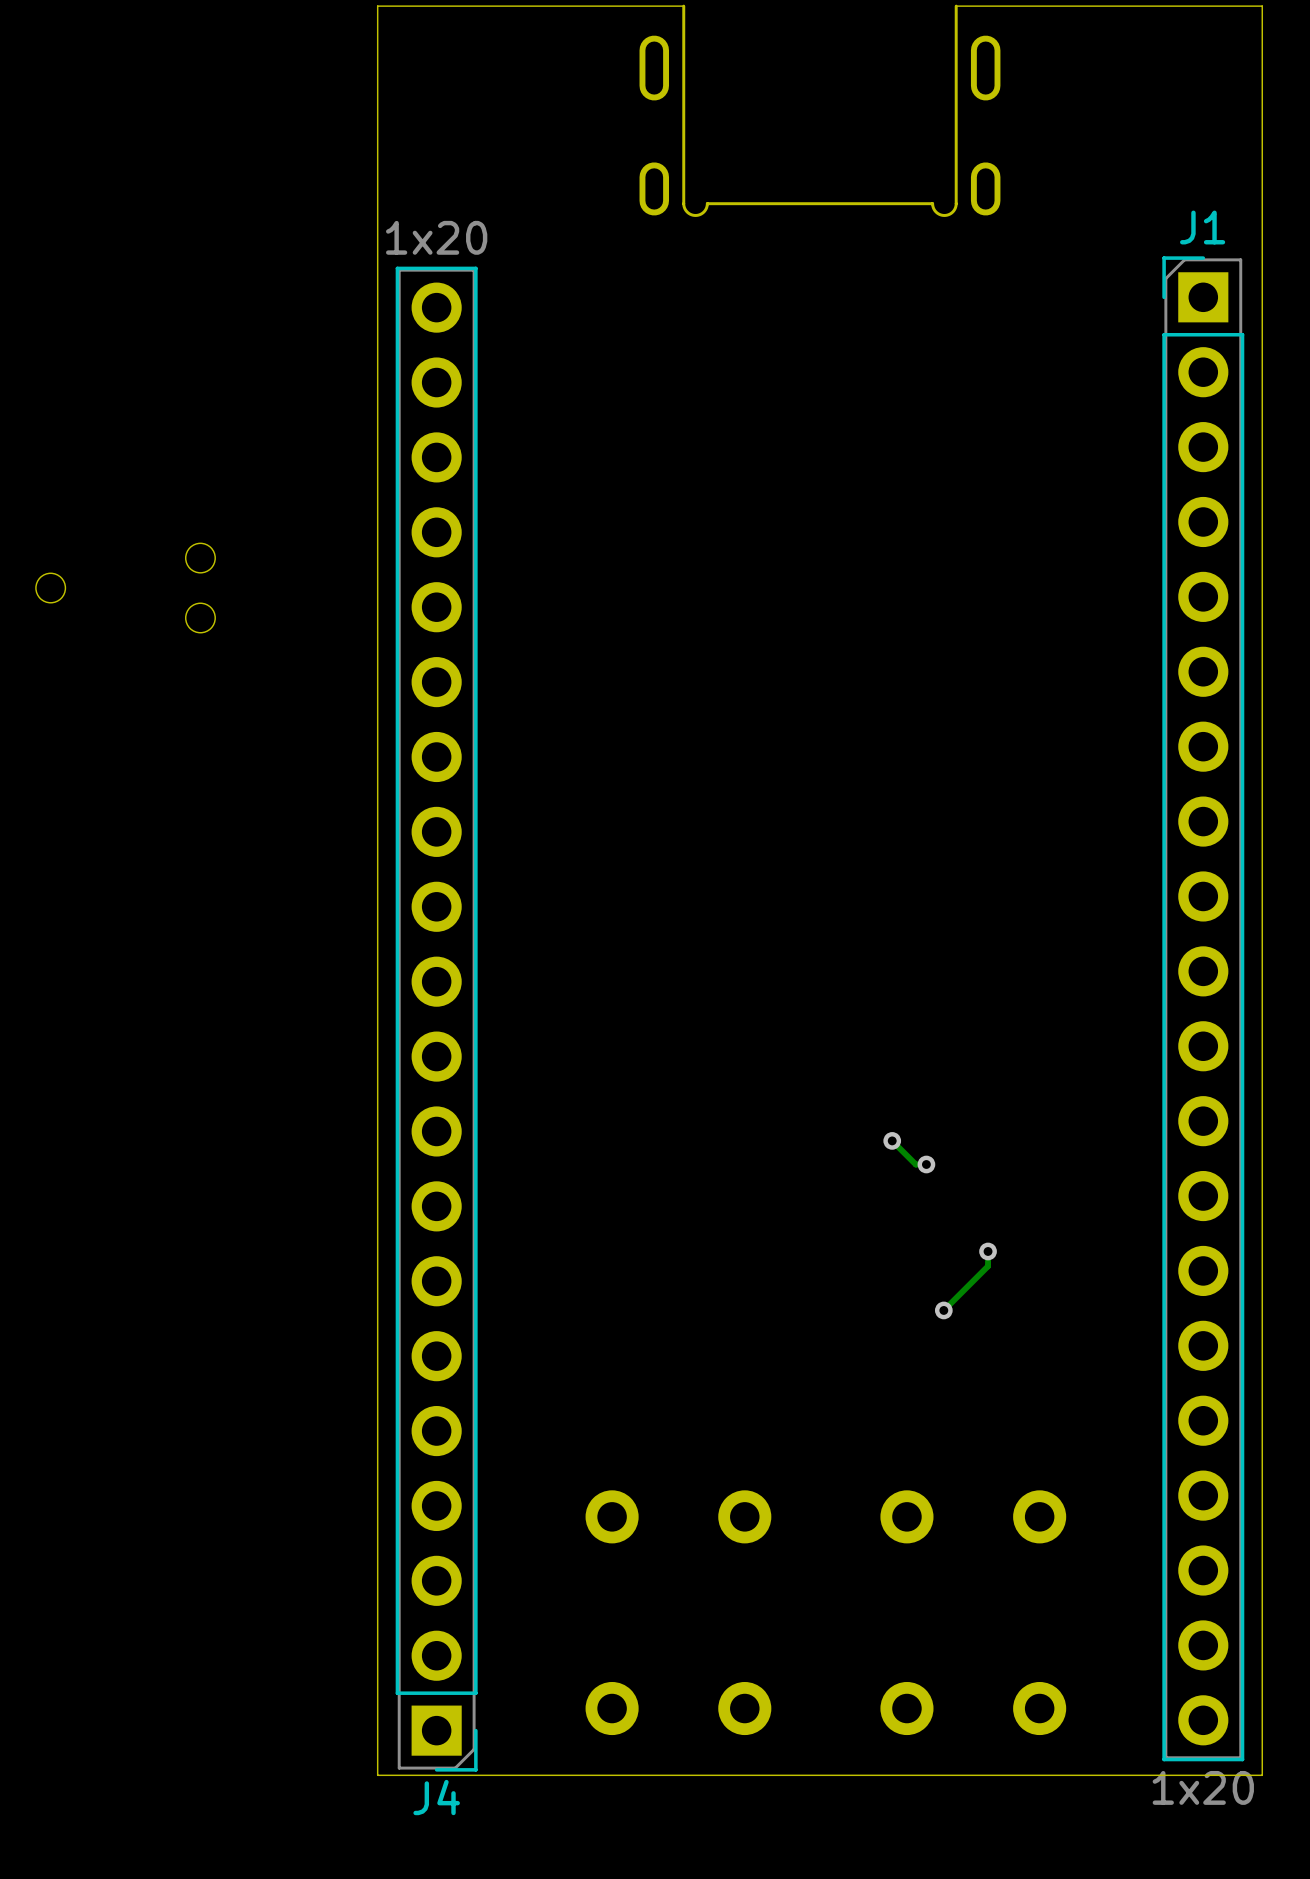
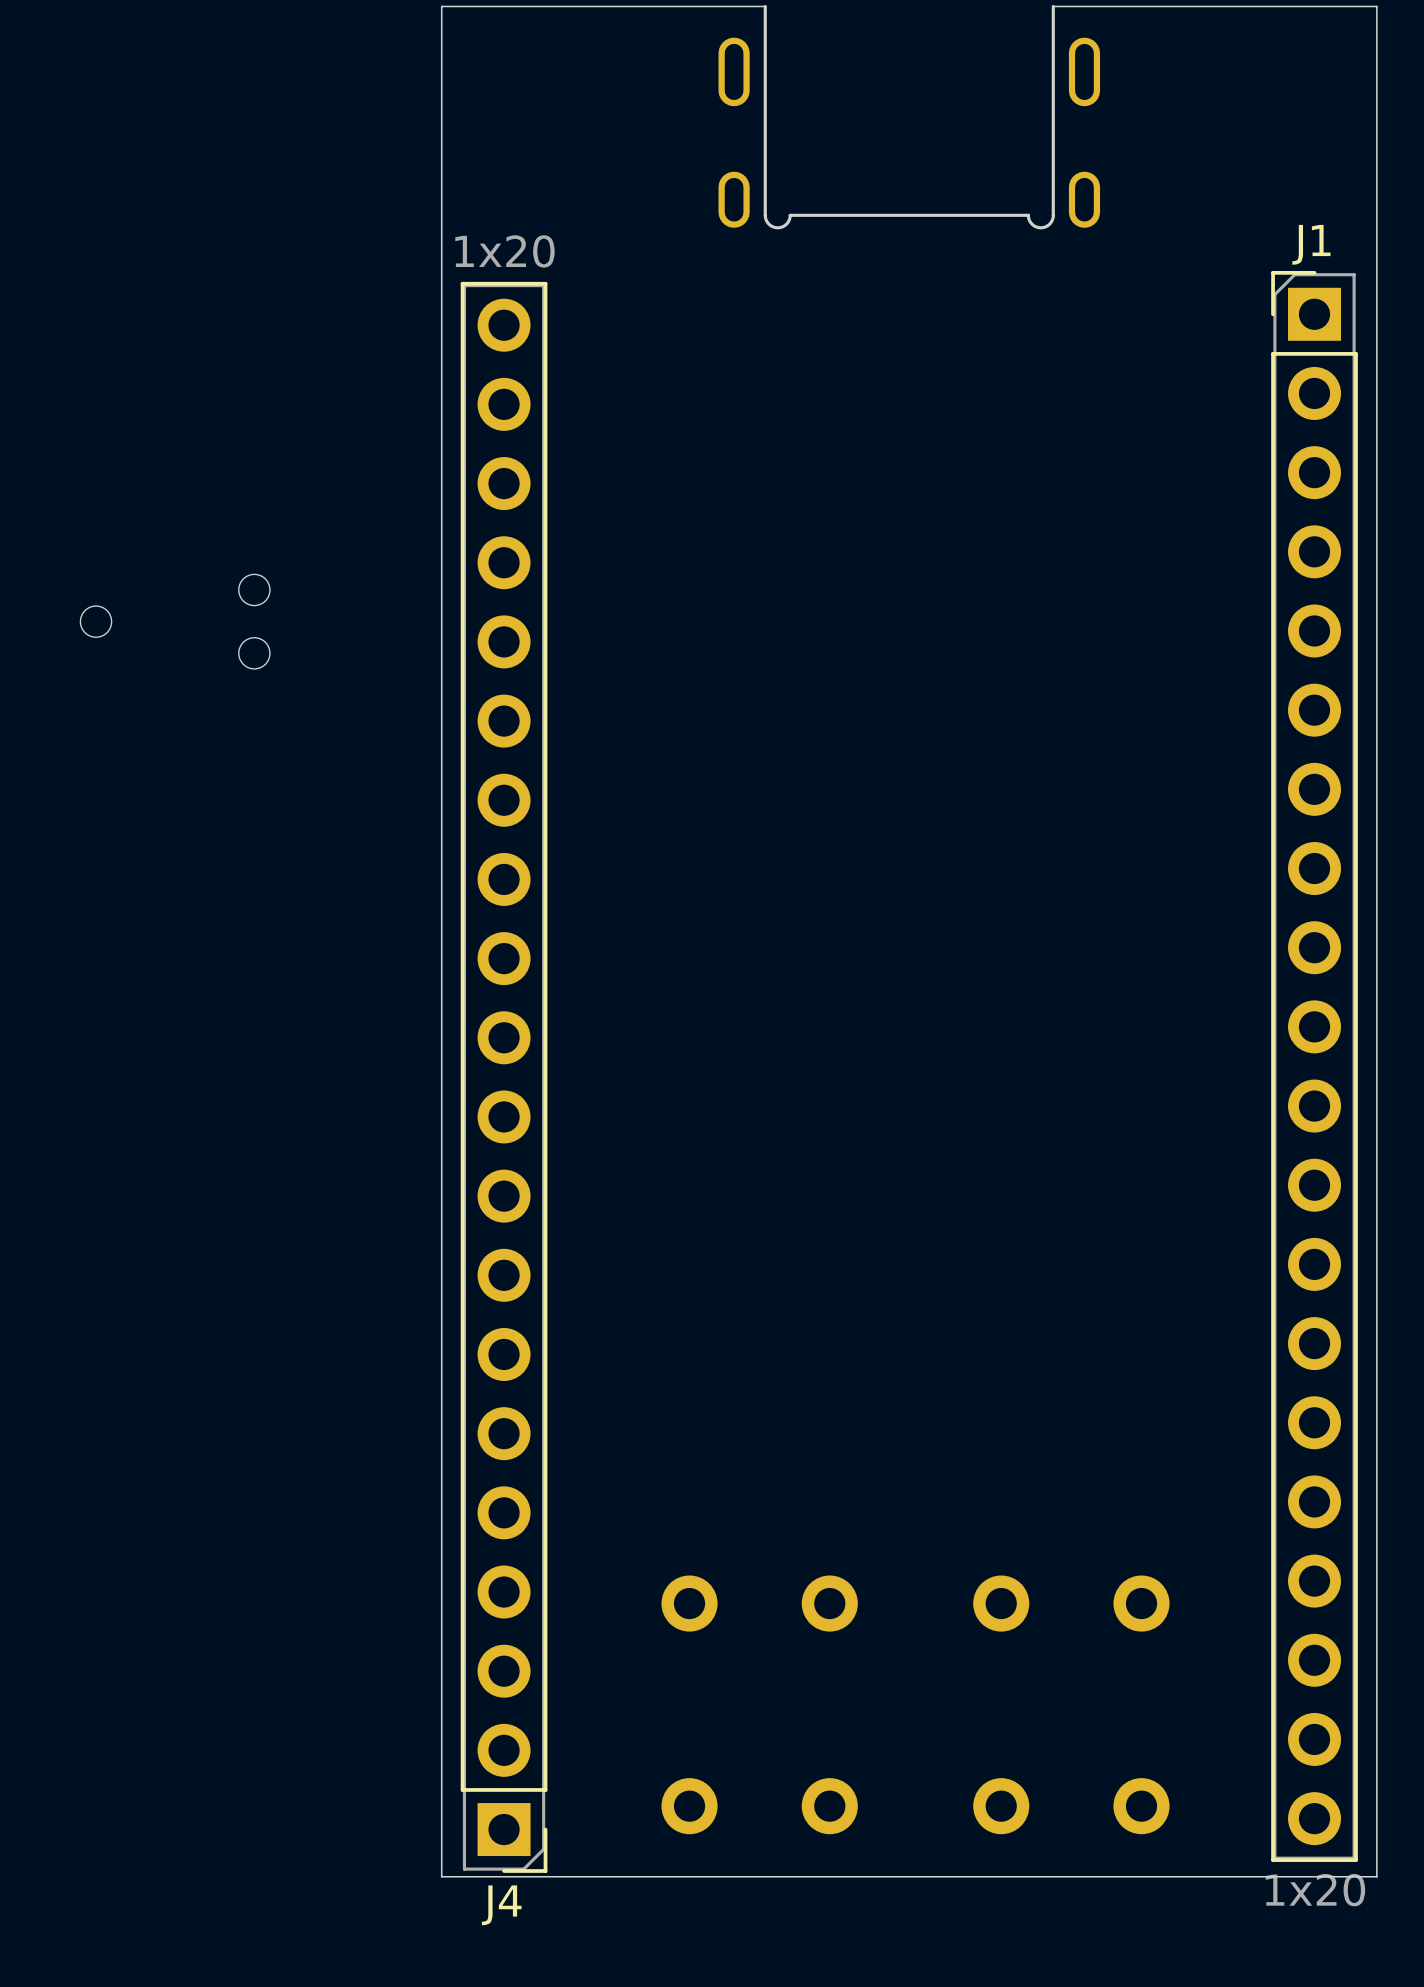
track: (892, 1140) (915, 1164) (926, 1164) -> none
via: (892, 1140) -> none
via: (926, 1164) -> none
track: (988, 1251) (988, 1266) (943, 1310) -> none
via: (988, 1251) -> none
via: (943, 1310) -> none

